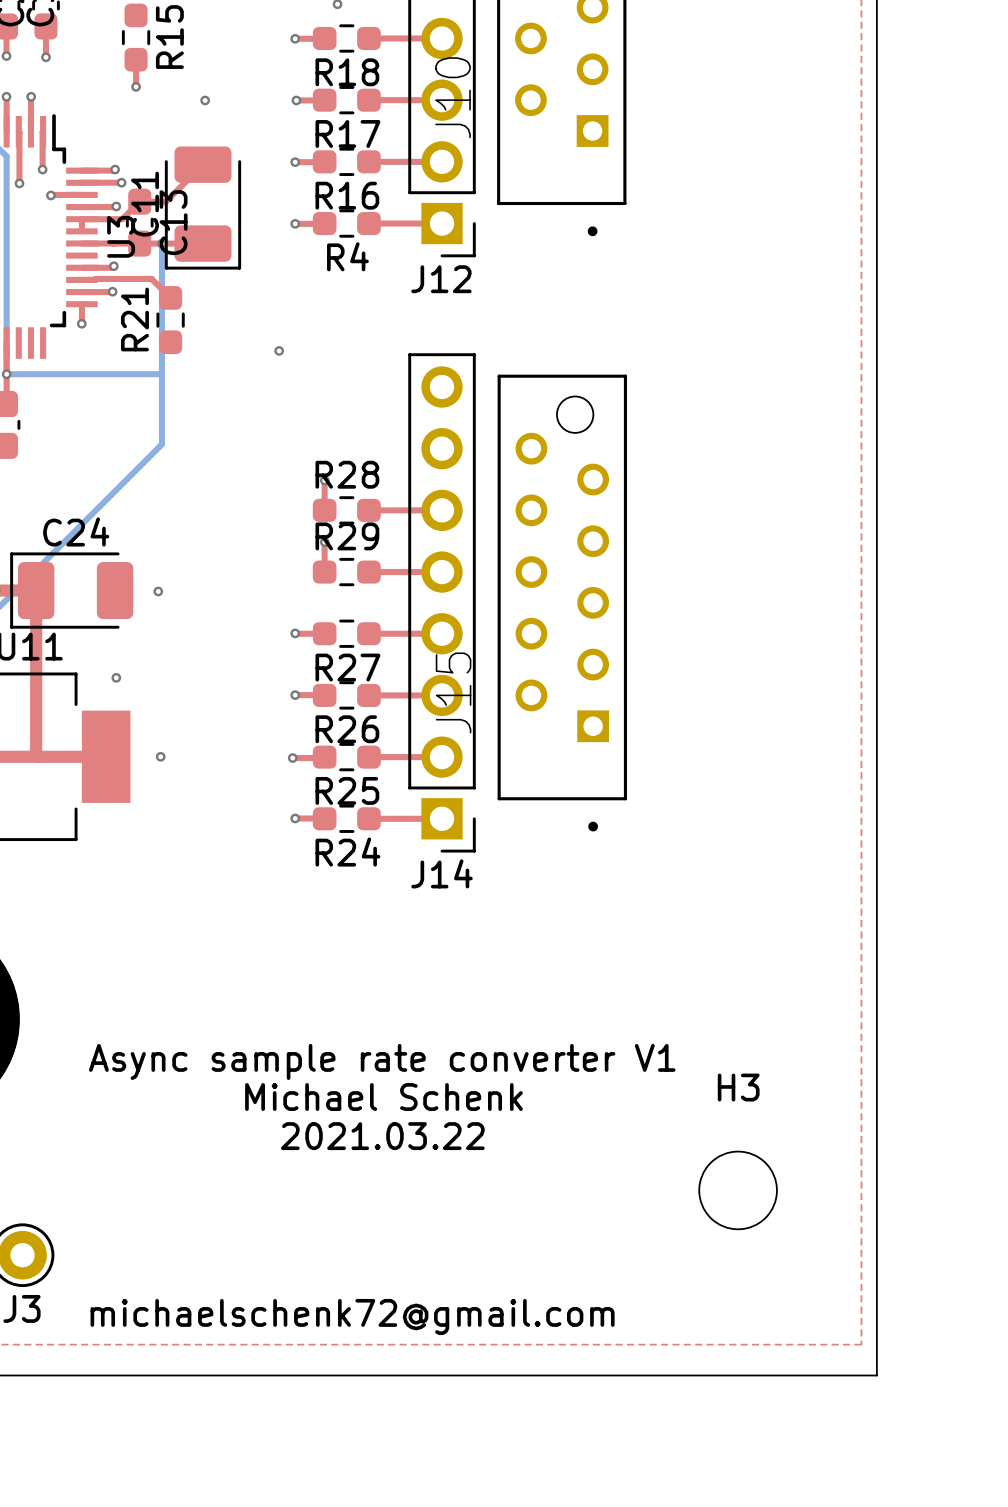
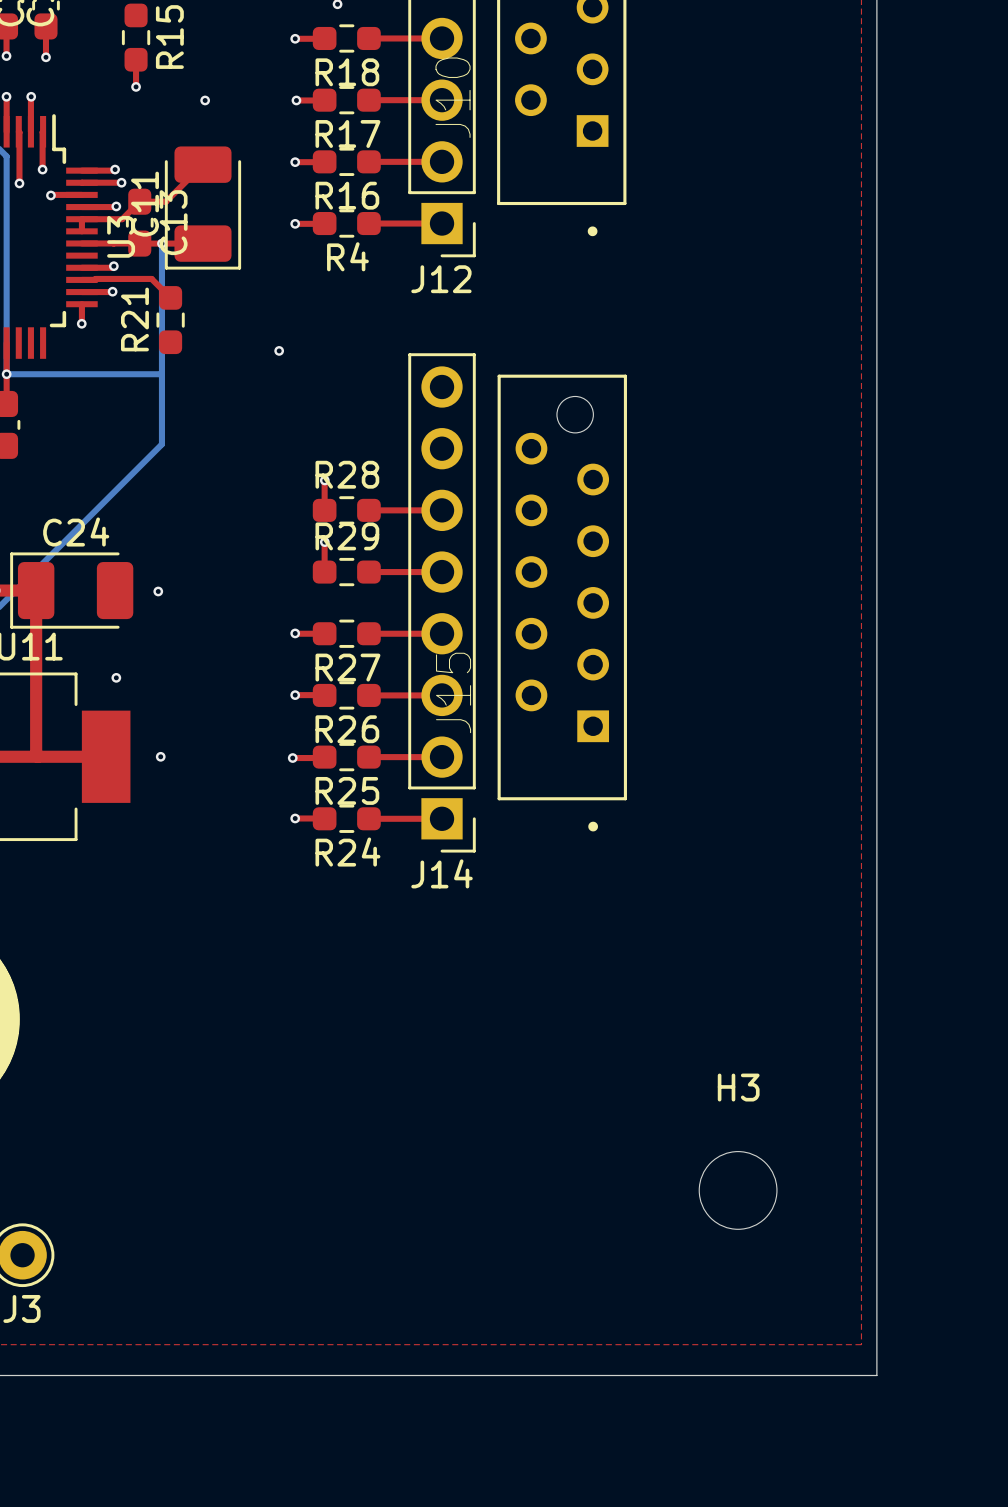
text: Async sample rate converter V1 (382, 1061) -> none
text: Michael Schenk (383, 1097) -> none
text: 2021.03.22 (382, 1136) -> none
text: michaelschenk72@gmail.com (352, 1316) -> none

